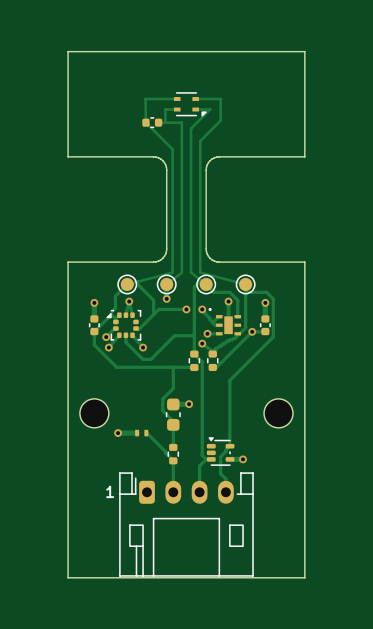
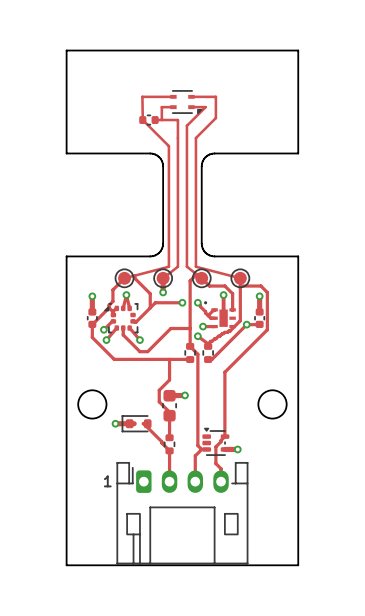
part footprint: [135, 429, 149, 437] -> [121, 415, 152, 433]

